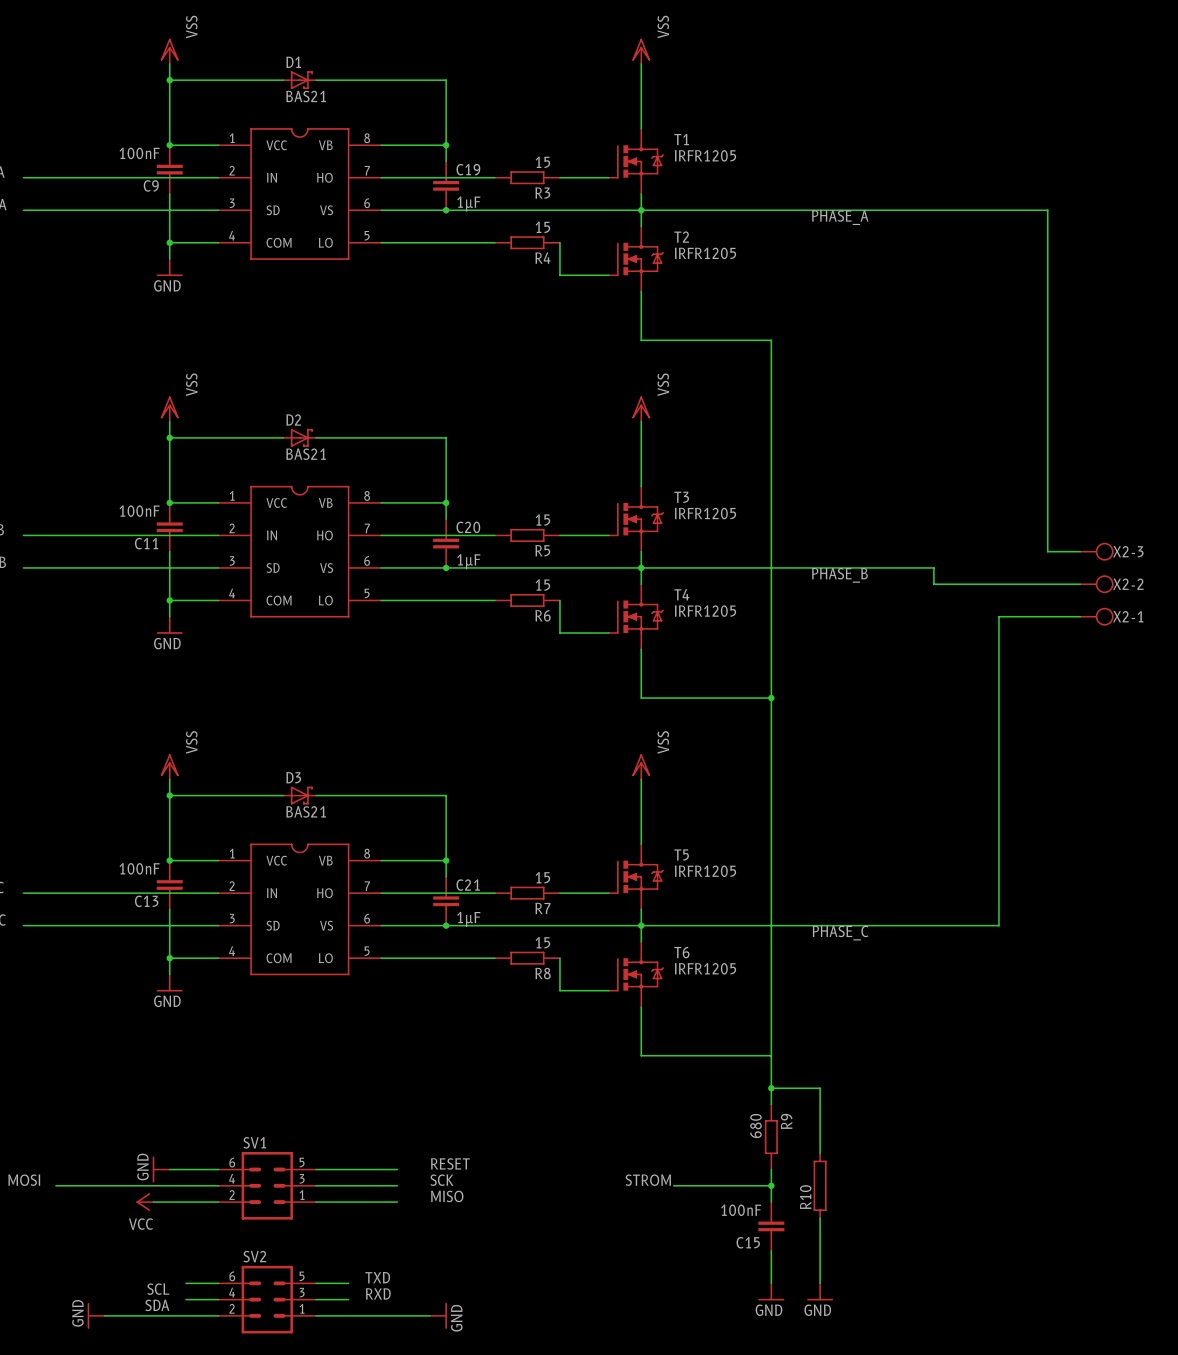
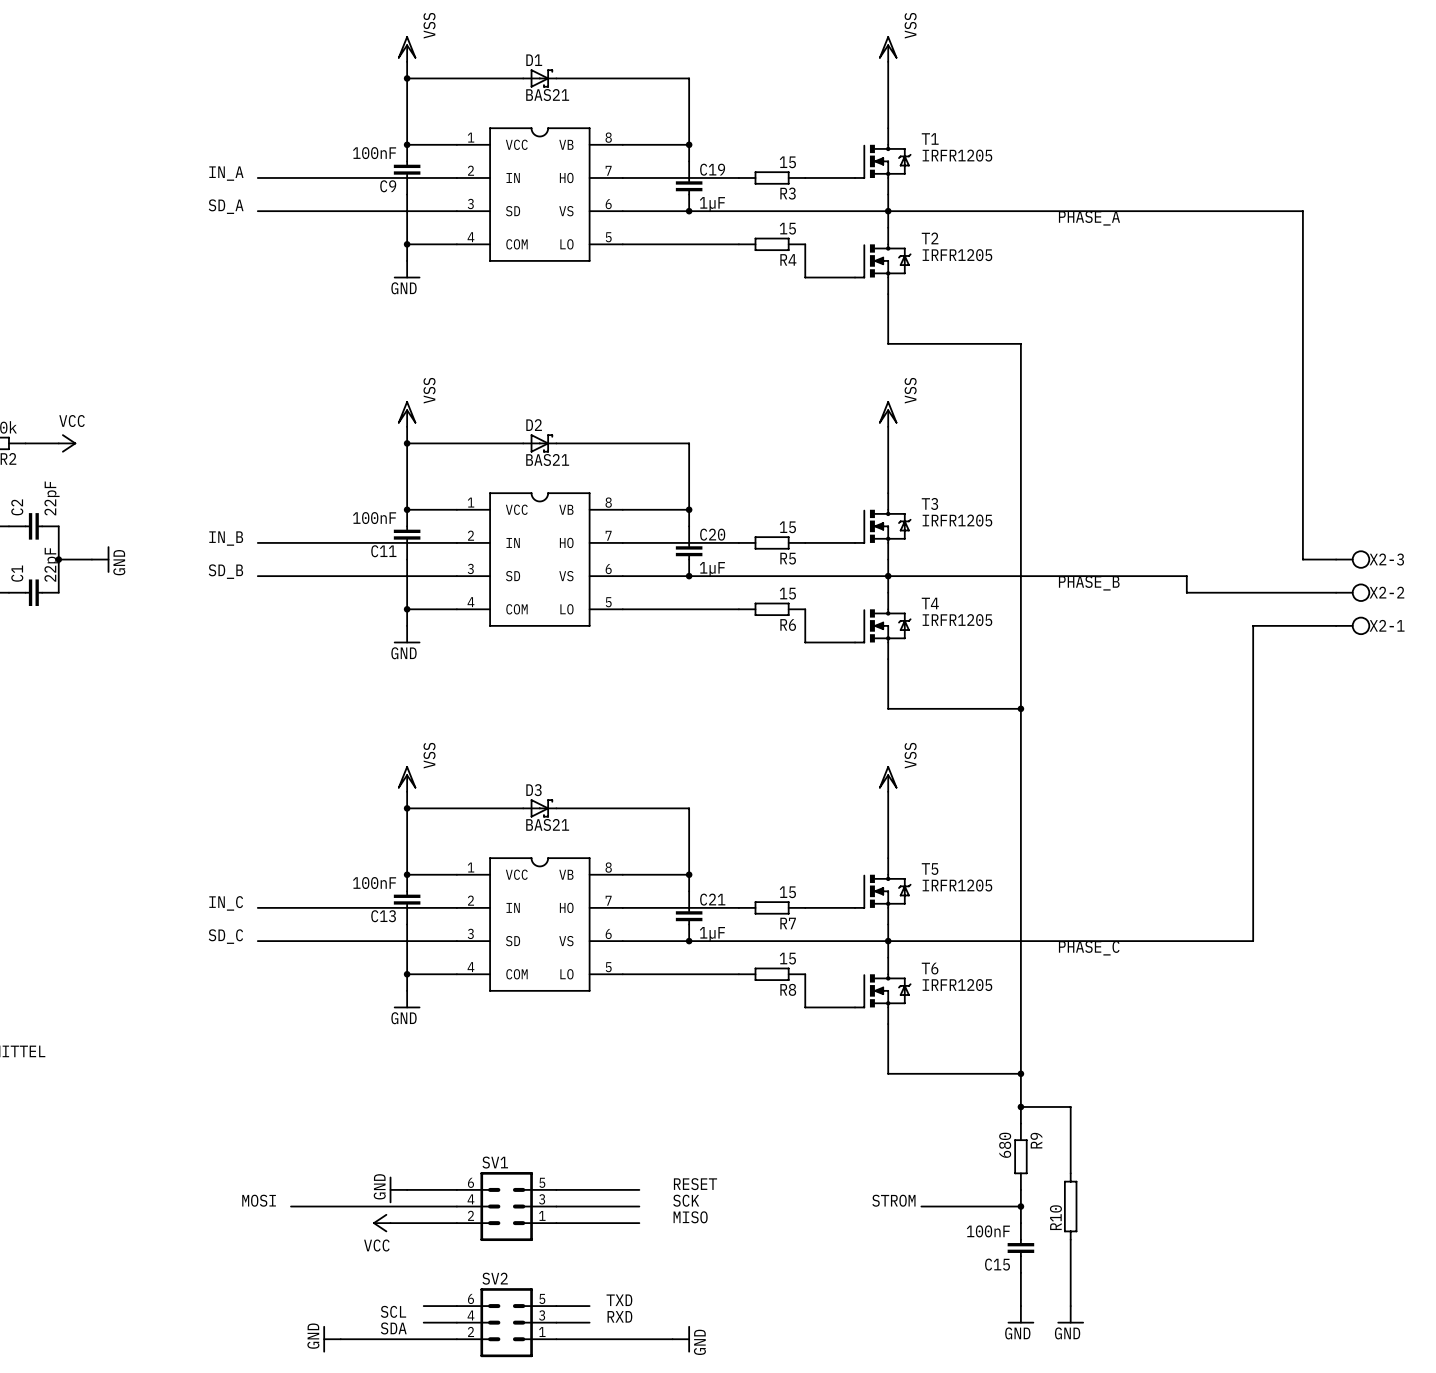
junction: none -> (1020, 1073)

